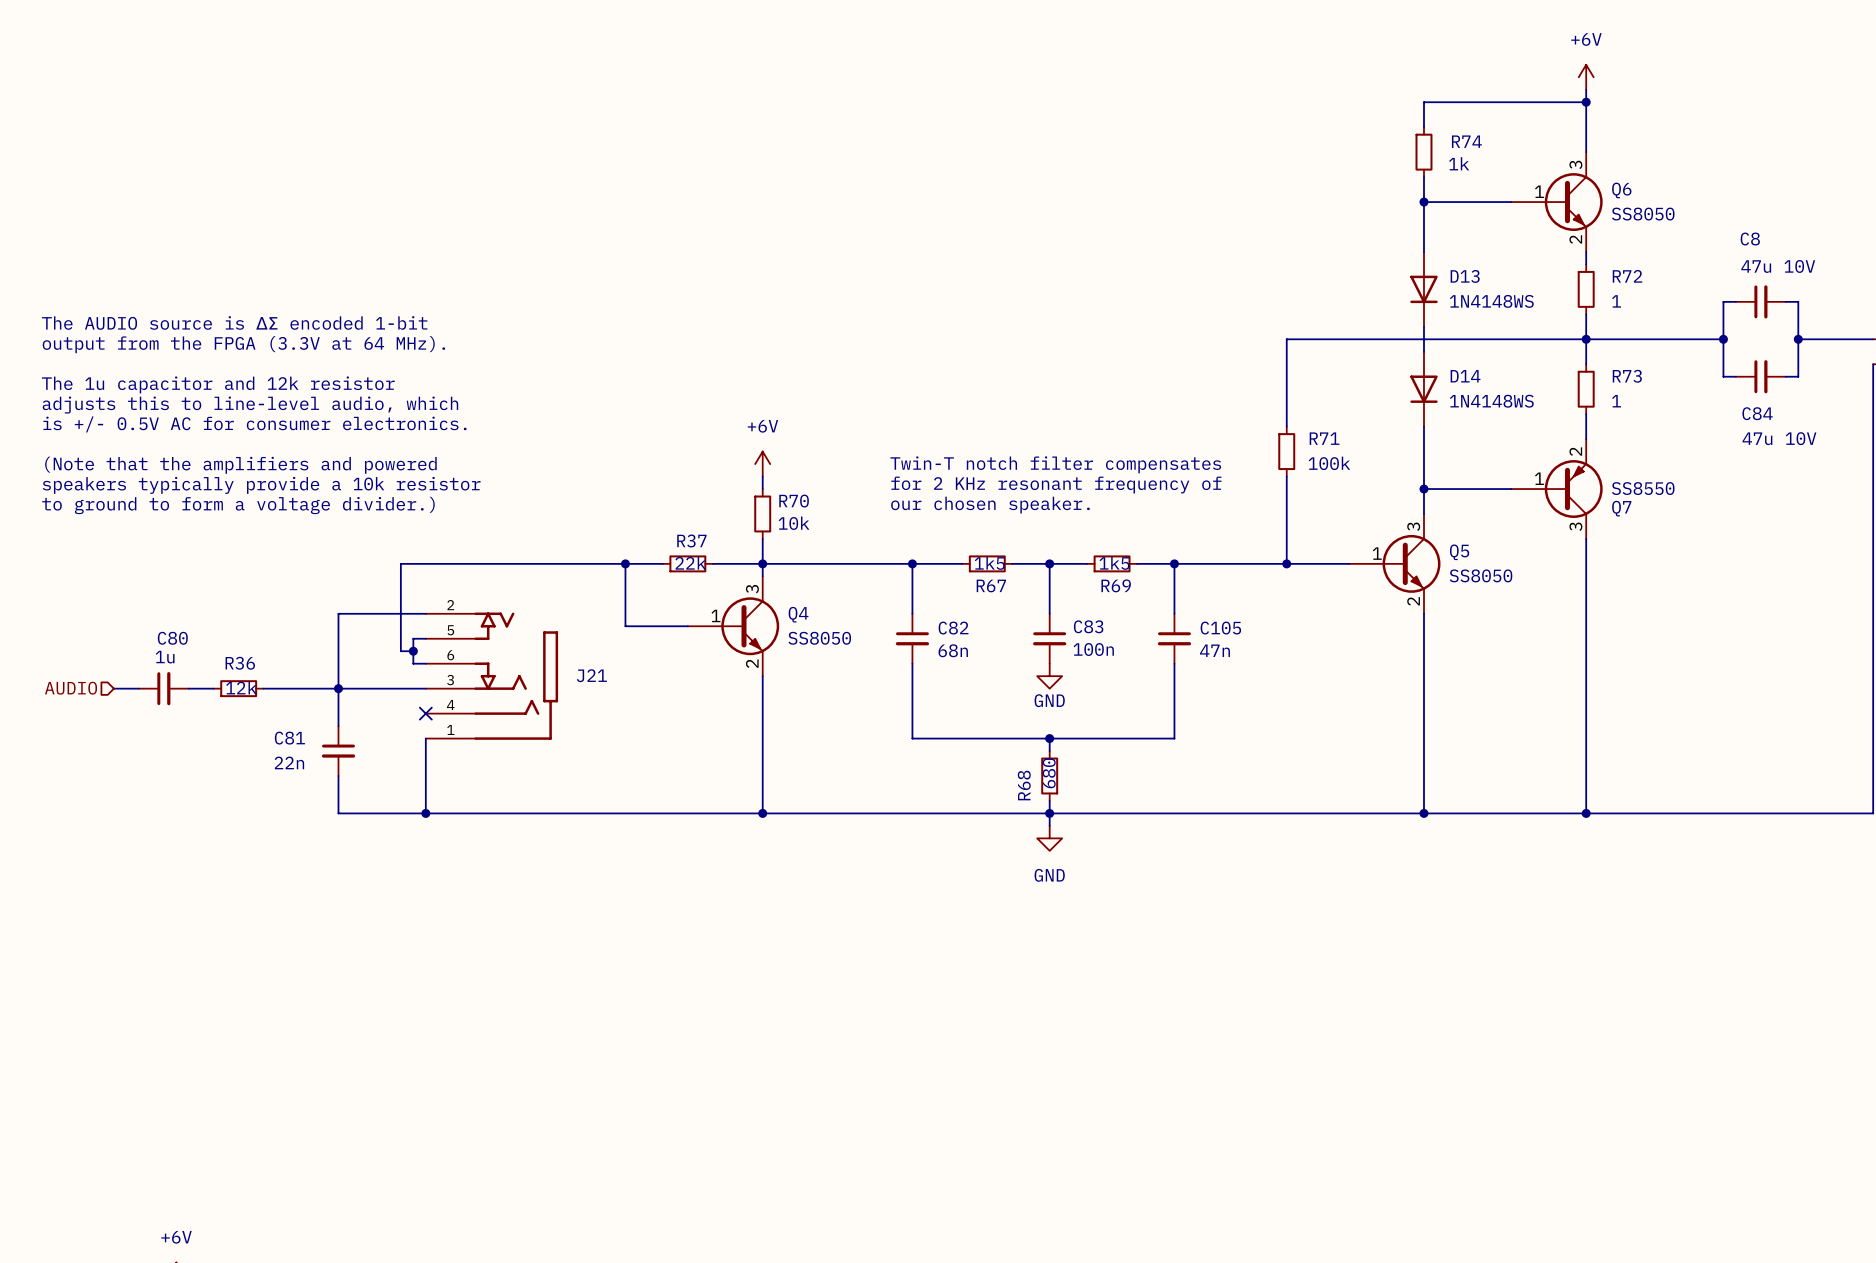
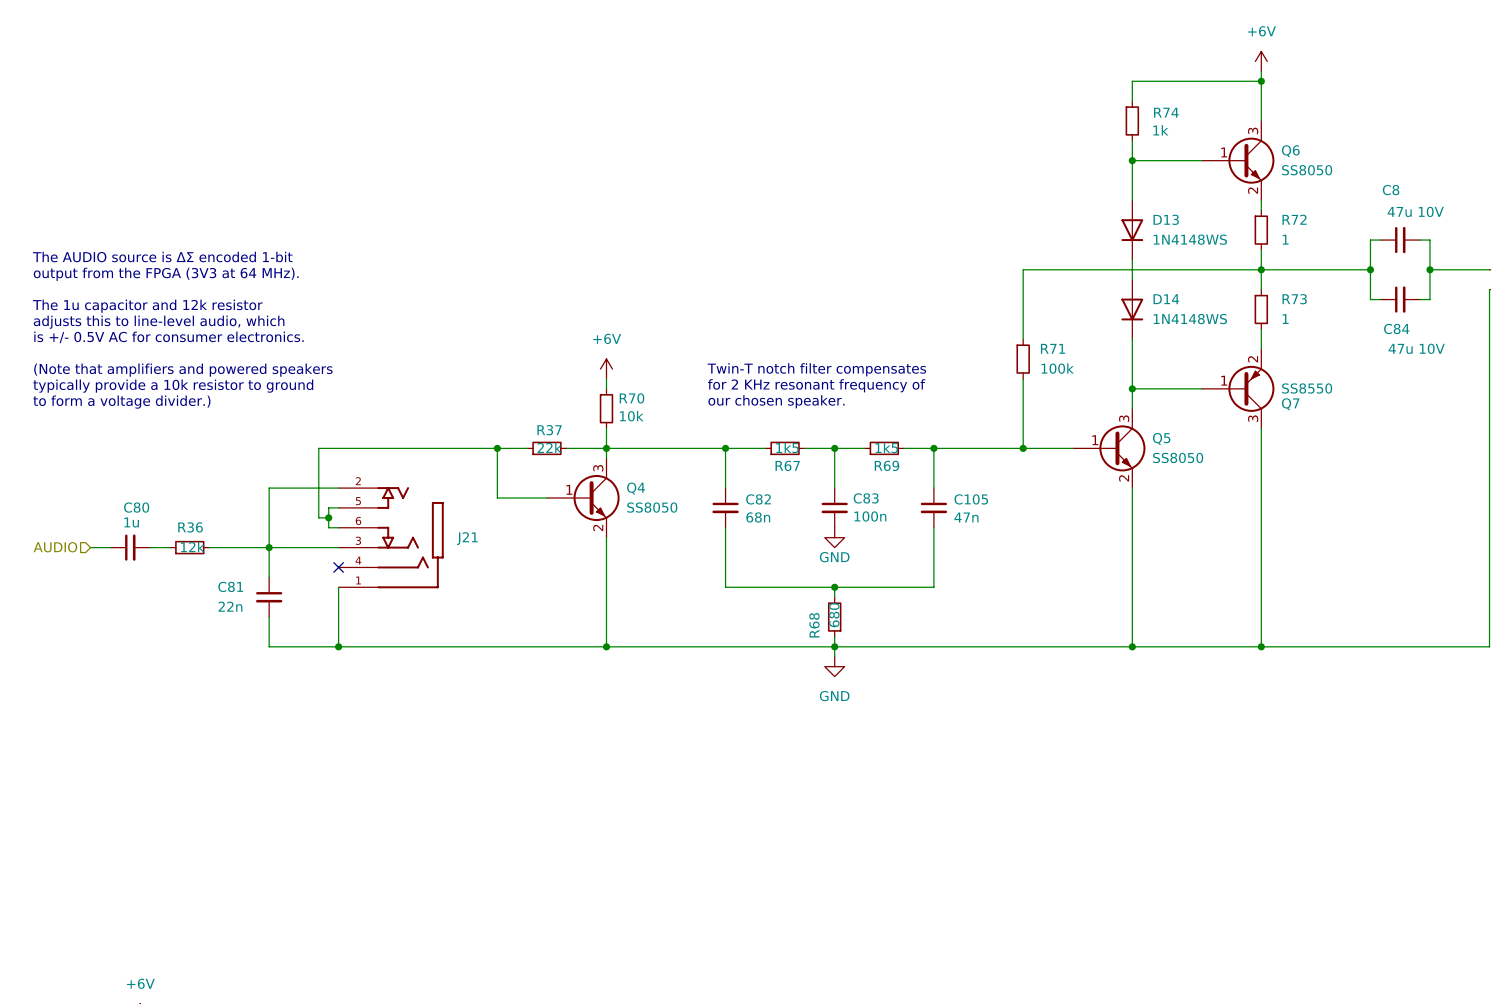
text: output from the FPGA (3.3V at 64 MHz). (243, 344) -> output from the FPGA (3V3 at 64 MHz). (166, 274)
text: (Note that the amplifiers and powered (240, 465) -> (Note that amplifiers and powered speakers (183, 370)
text: speakers typically provide a 10k resistor (261, 485) -> typically provide a 10k resistor to ground (173, 386)
text: to ground to form a voltage divider.) (238, 505) -> to form a voltage divider.) (121, 402)

